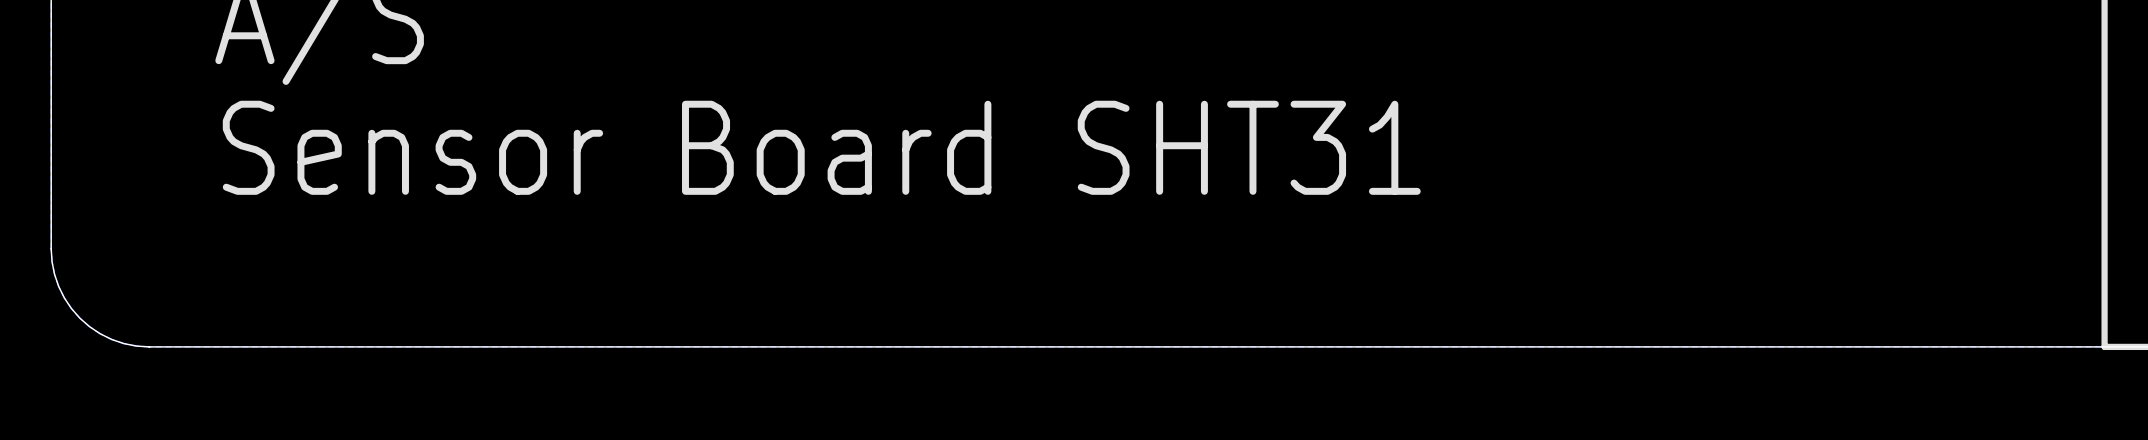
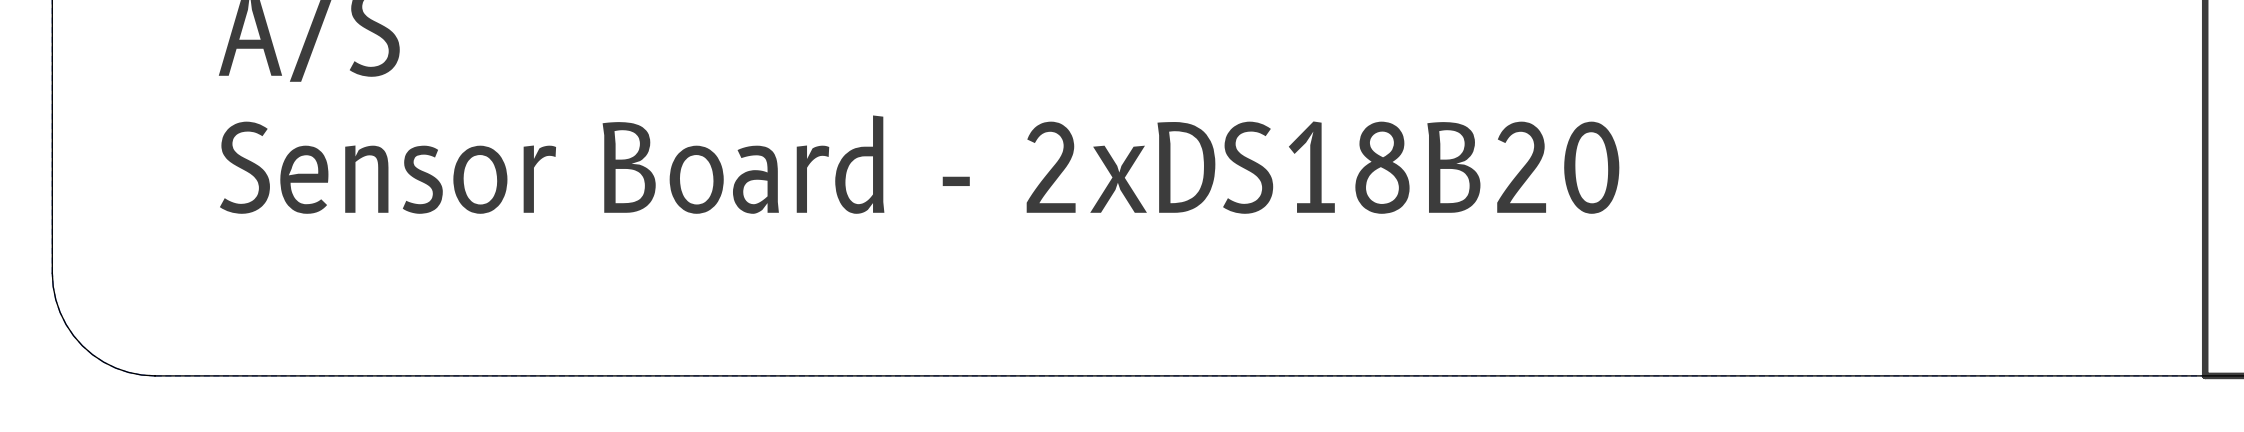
text: Sensor Board SHT31 (821, 147) -> Sensor Board - 2xDS18B20 (919, 164)

